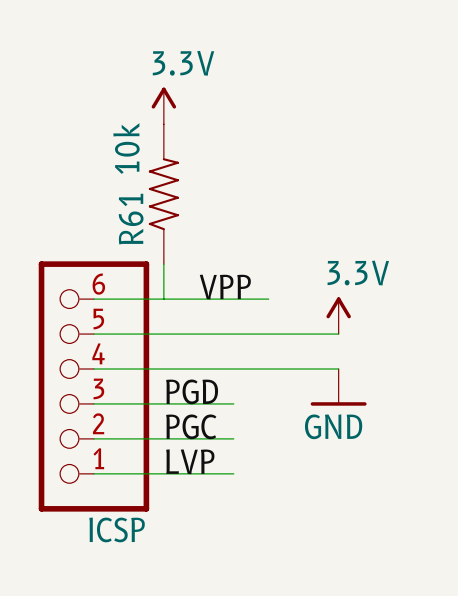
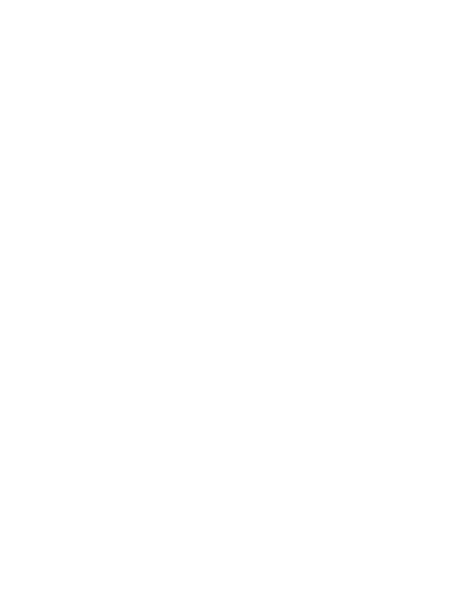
power symbol: 3.3V (163, 105) -> none
R61: 10k (163, 194) -> none
wire: (163, 264) (163, 299) -> none
label: VPP (225, 287) -> none
wire: (93, 299) (268, 299) -> none
power symbol: 3.3V (338, 315) -> none
wire: (93, 334) (338, 334) -> none
wire: (93, 369) (338, 369) -> none
ICSP: (93, 386) -> none
power symbol: GND (338, 387) -> none
label: PGD (192, 391) -> none
wire: (93, 403) (233, 403) -> none
label: PGC (191, 426) -> none
wire: (93, 438) (233, 438) -> none
label: LVP (190, 461) -> none
wire: (93, 473) (233, 473) -> none

